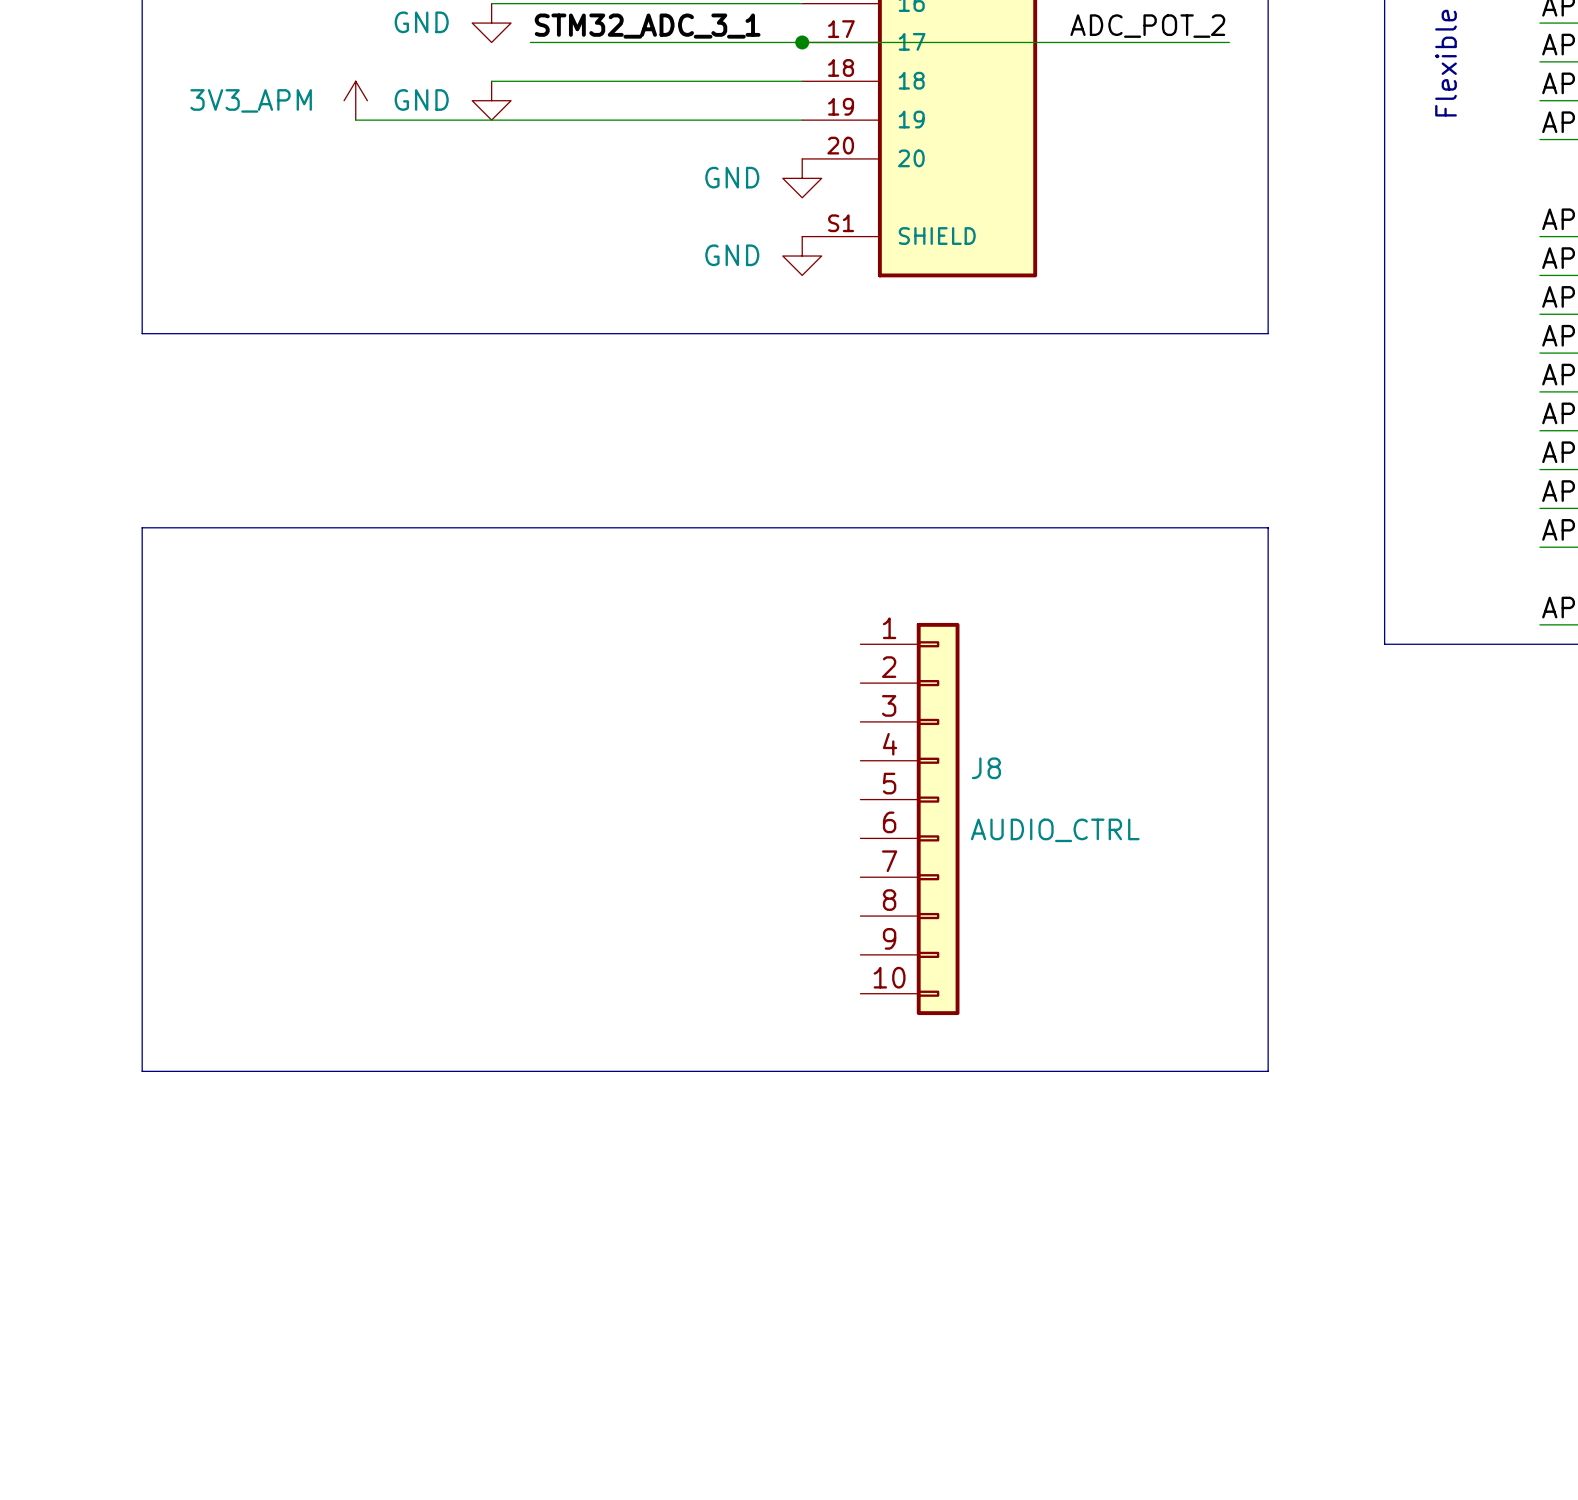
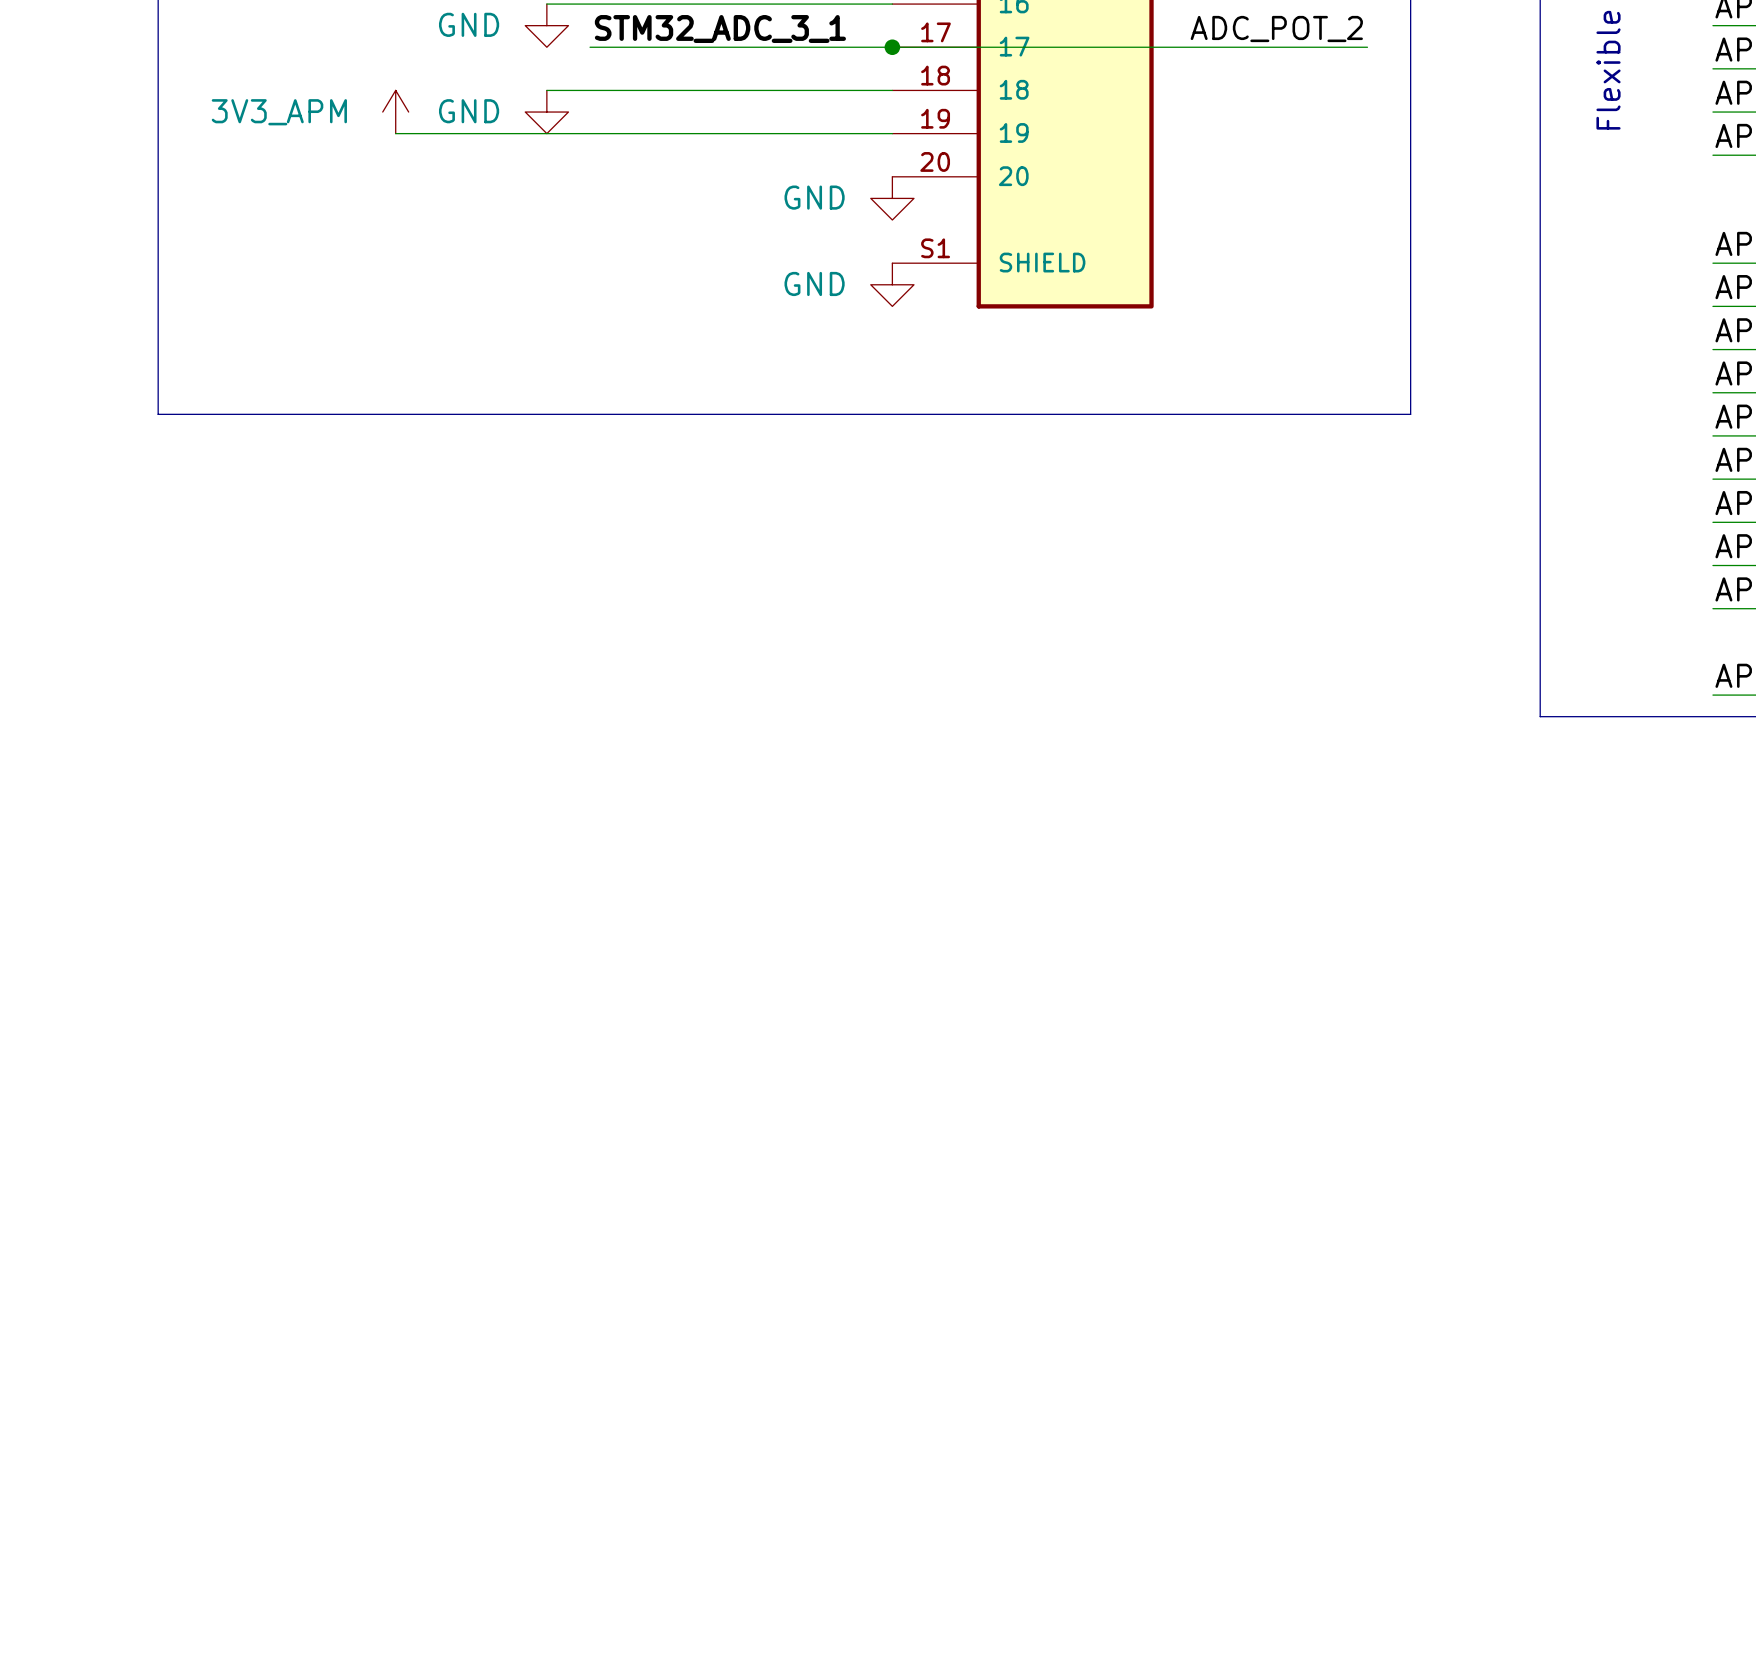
line: (142, 333) (1268, 333) -> (158, 371) (158, 414) (1410, 414) (1410, 371)
line: (142, 527) (142, 1071) (1268, 1071) (1268, 527) (142, 527) -> none
J8: AUDIO_CTRL (909, 818) -> none

